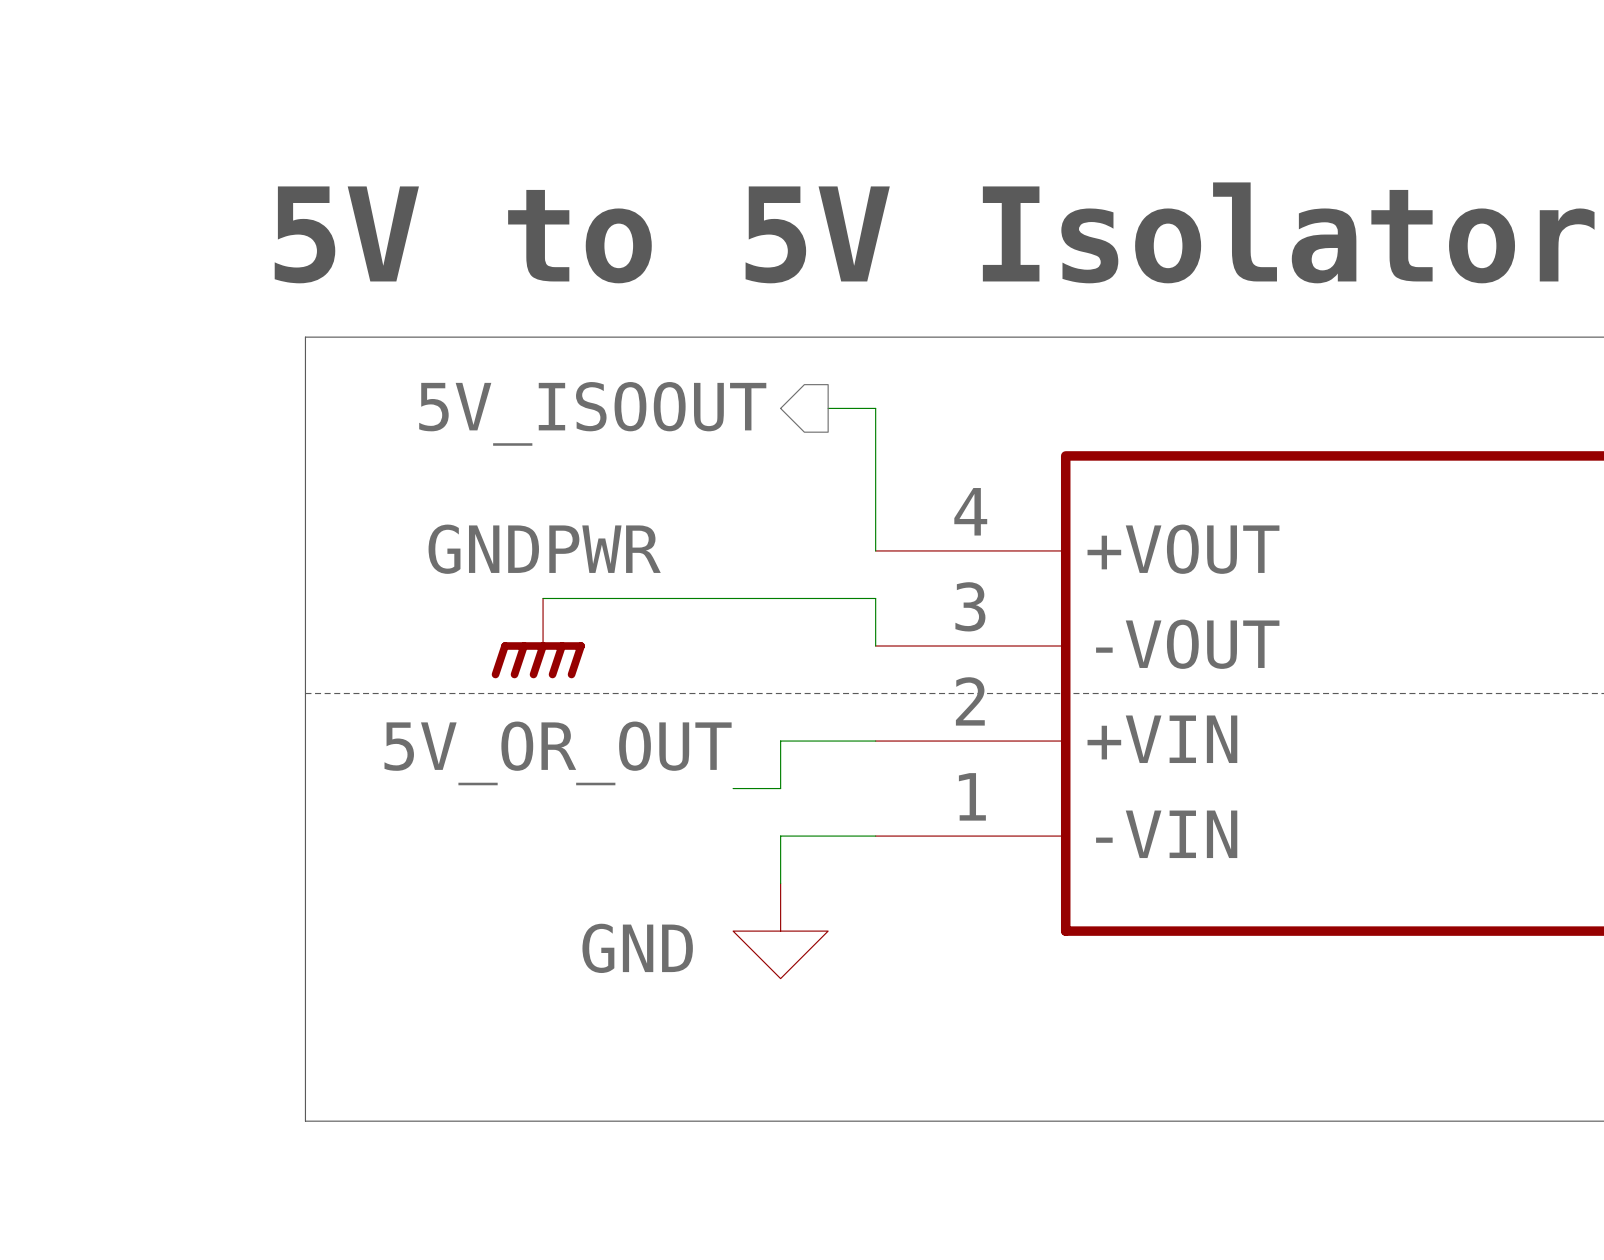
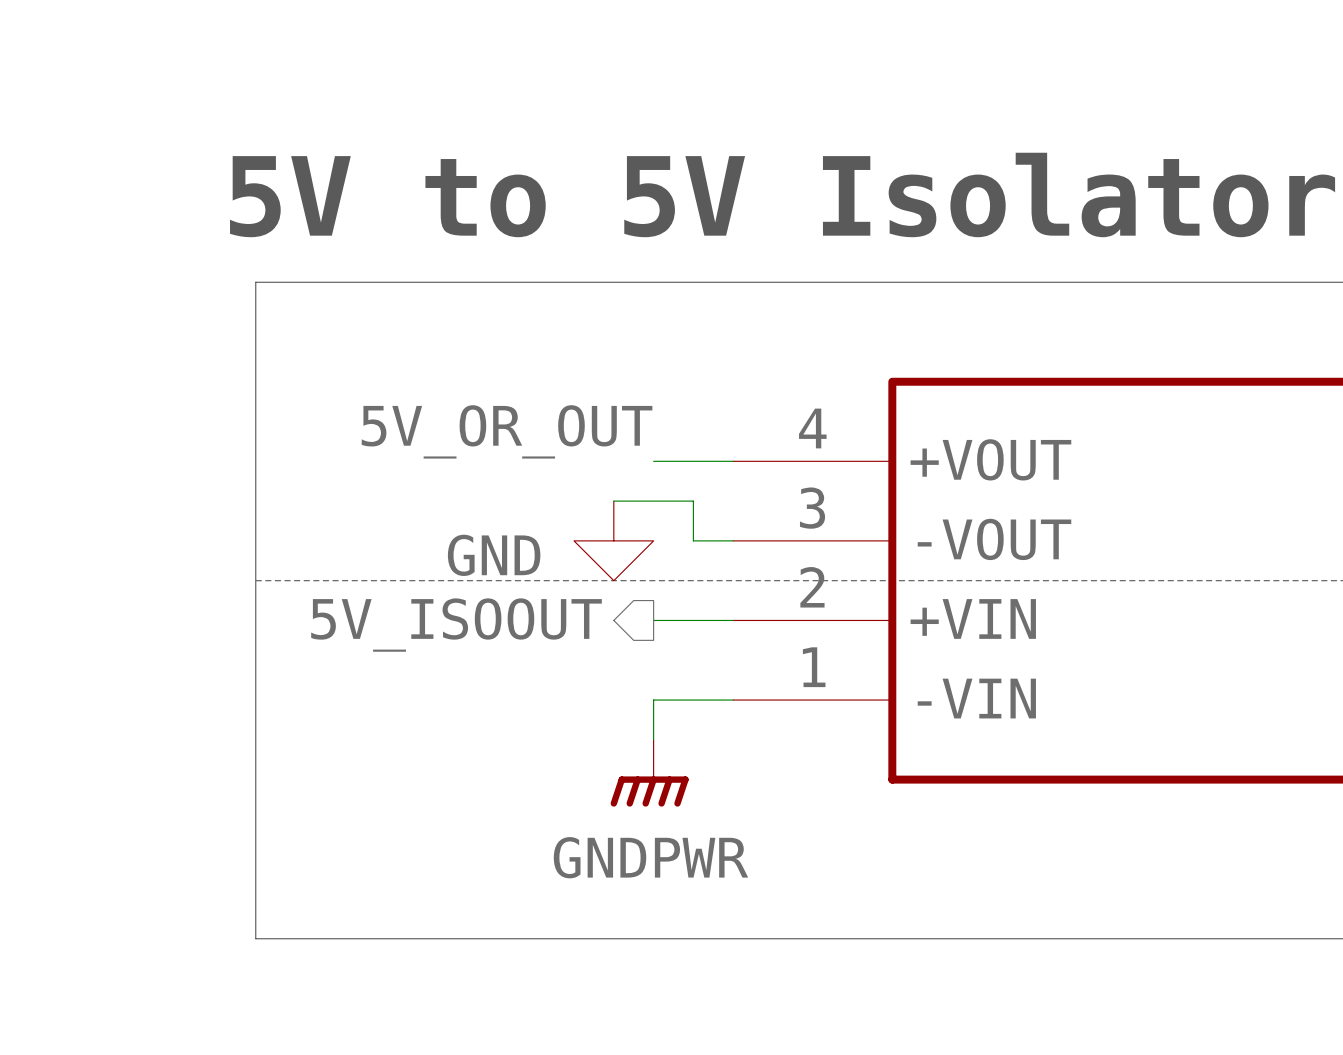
wire: (828, 408) (875, 408) (875, 550) -> (653, 461) (733, 461)
hierarchical label position: 5V_ISOOUT (592, 413) -> 5V_ISOOUT (456, 625)
wire: (543, 598) (733, 598) -> none
wire: (828, 598) (875, 598) (875, 646) -> (693, 501) (693, 540) (733, 540)
power symbol: GNDPWR (538, 638) -> none
power symbol: none -> GND (613, 540)
wire: (780, 741) (780, 788) (733, 788) -> none
label position: 5V_OR_OUT (558, 753) -> 5V_OR_OUT (507, 431)
power symbol: GND (780, 931) -> GNDPWR (649, 773)

